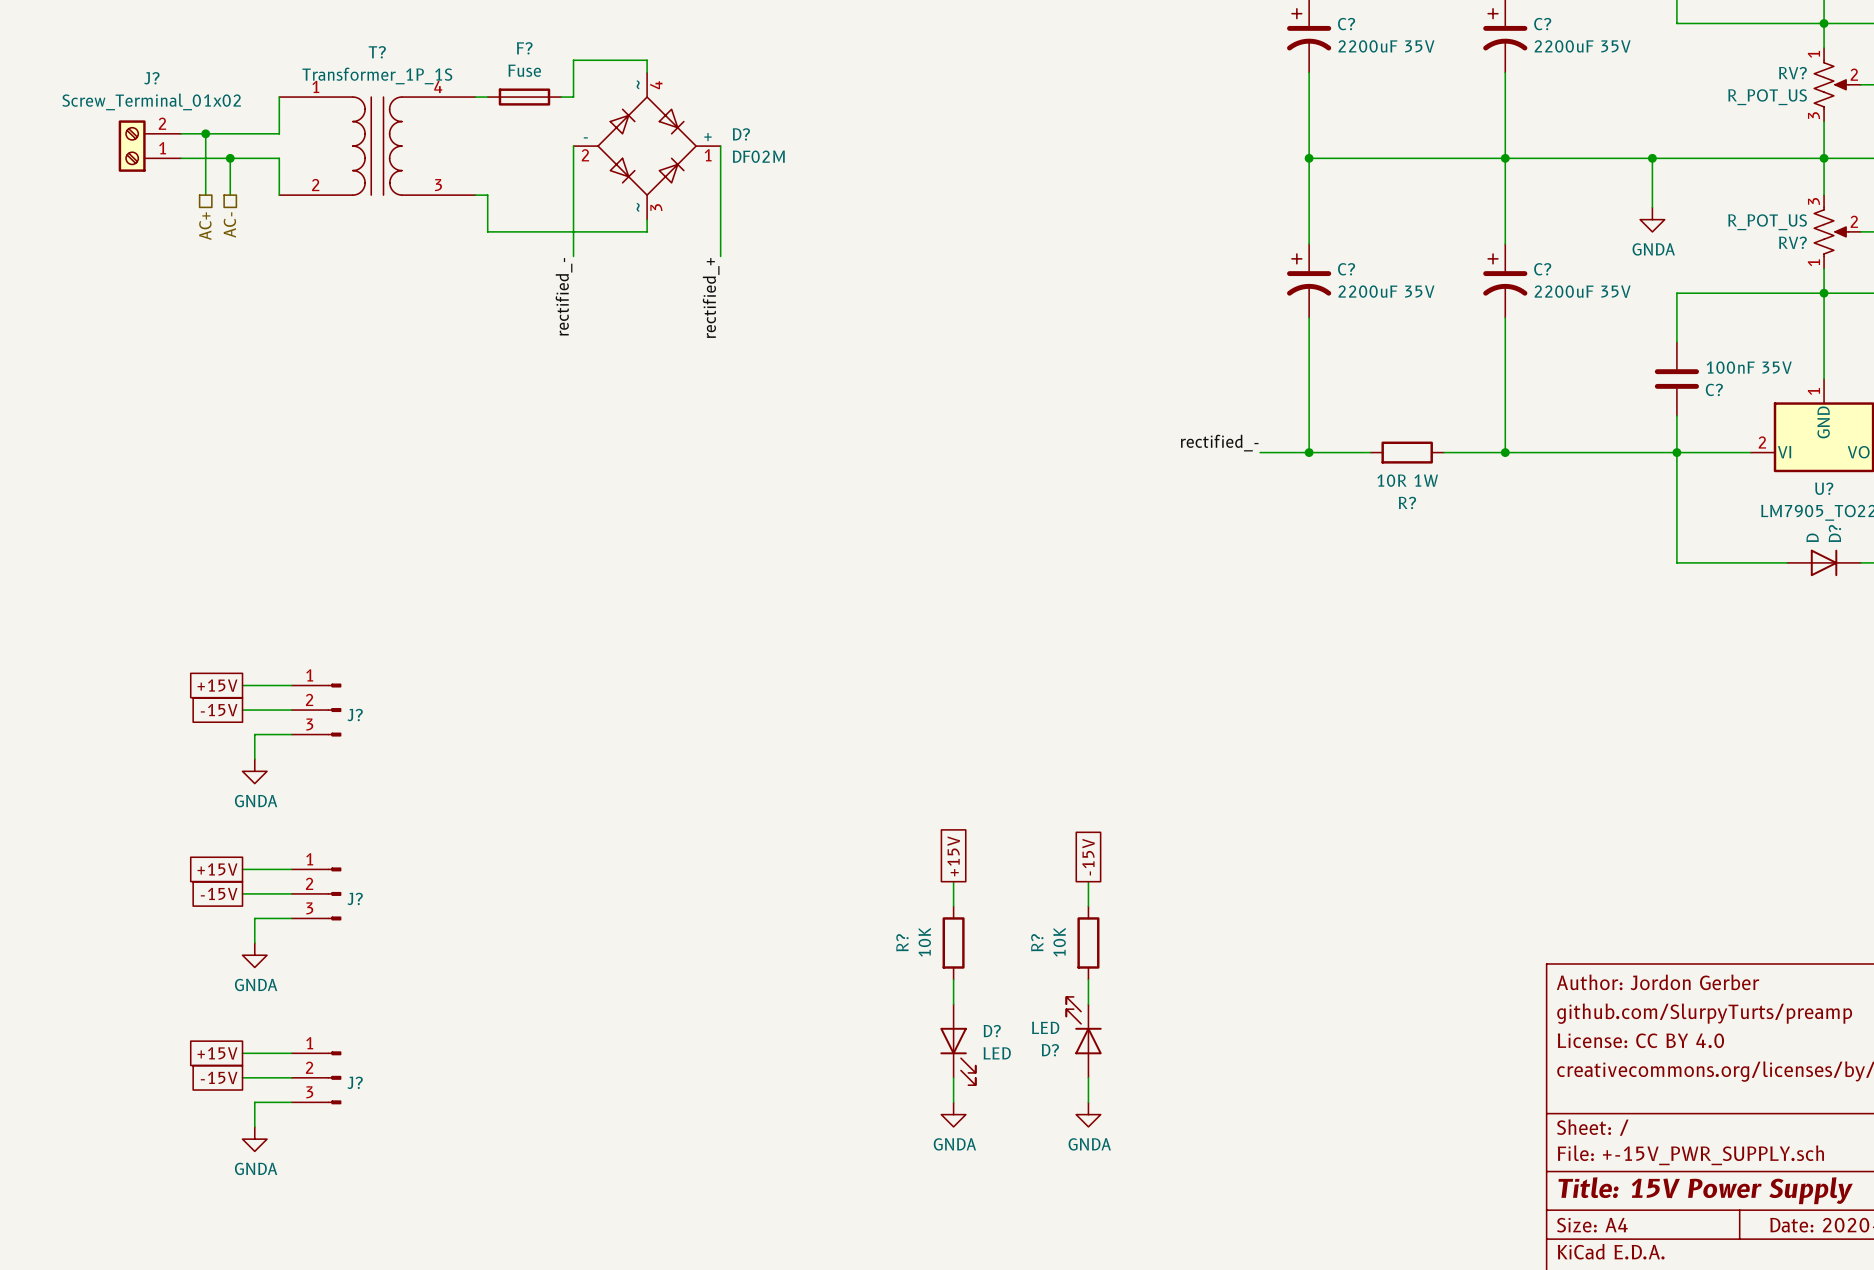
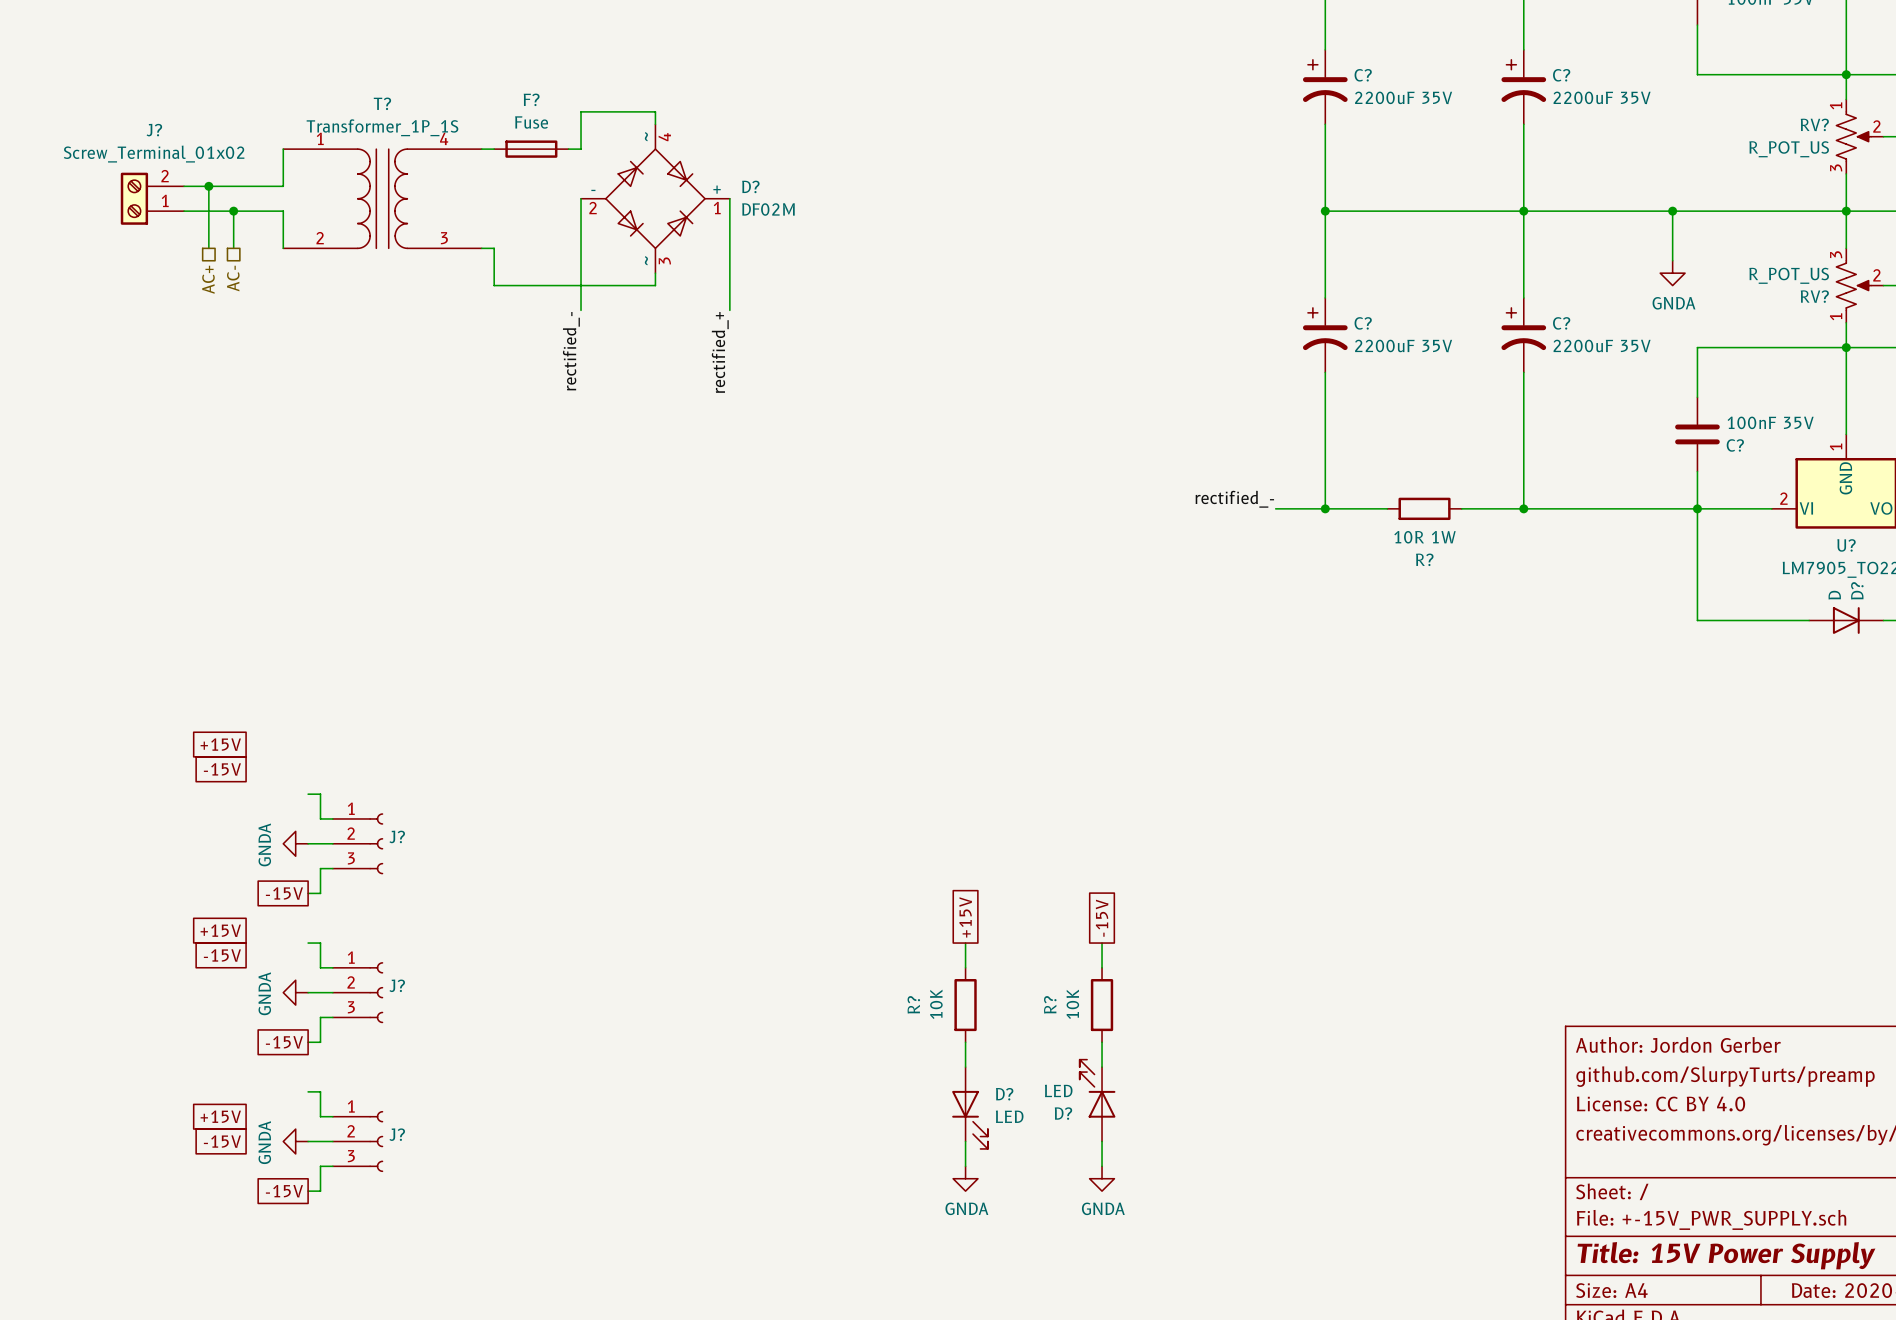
wire: (242, 685) (291, 685) -> none
wire: (242, 710) (291, 710) -> none
J?: (316, 710) -> none
wire: (291, 734) (254, 734) (254, 759) -> none
wire: none -> (308, 794) (320, 794) (320, 818) (332, 818)
power symbol rotation: 0° (254, 771) -> 90° clockwise (295, 843)
power symbol position: GNDA (254, 771) -> GNDA (295, 843)
wire: none -> (308, 843) (332, 843)
J?: none -> (358, 843)
wire: none -> (332, 868) (320, 868) (320, 893) (308, 893)
global label: none -> -15V (284, 893)
wire: (242, 869) (291, 869) -> none
wire: none -> (308, 943) (320, 943) (320, 967) (332, 967)
wire: (242, 893) (291, 893) -> none
J?: (316, 893) -> none
wire: (291, 918) (254, 918) (254, 942) -> none
wire: none -> (308, 992) (332, 992)
J?: none -> (358, 992)
power symbol rotation: 0° (254, 955) -> 90° clockwise (295, 992)
power symbol position: GNDA (254, 955) -> GNDA (295, 992)
wire: none -> (332, 1017) (320, 1017) (320, 1042) (308, 1042)
global label: none -> -15V (284, 1042)
wire: none -> (308, 1091) (320, 1091) (320, 1116) (332, 1116)
wire: (242, 1053) (291, 1053) -> none
wire: (242, 1077) (291, 1077) -> none
power symbol: none -> GNDA (295, 1141)
J?: (316, 1077) -> none
J?: none -> (358, 1141)
wire: (291, 1102) (254, 1102) (254, 1126) -> none
wire: none -> (332, 1166) (320, 1166) (320, 1191) (308, 1191)
global label: none -> -15V (284, 1191)
power symbol: GNDA (254, 1139) -> none

